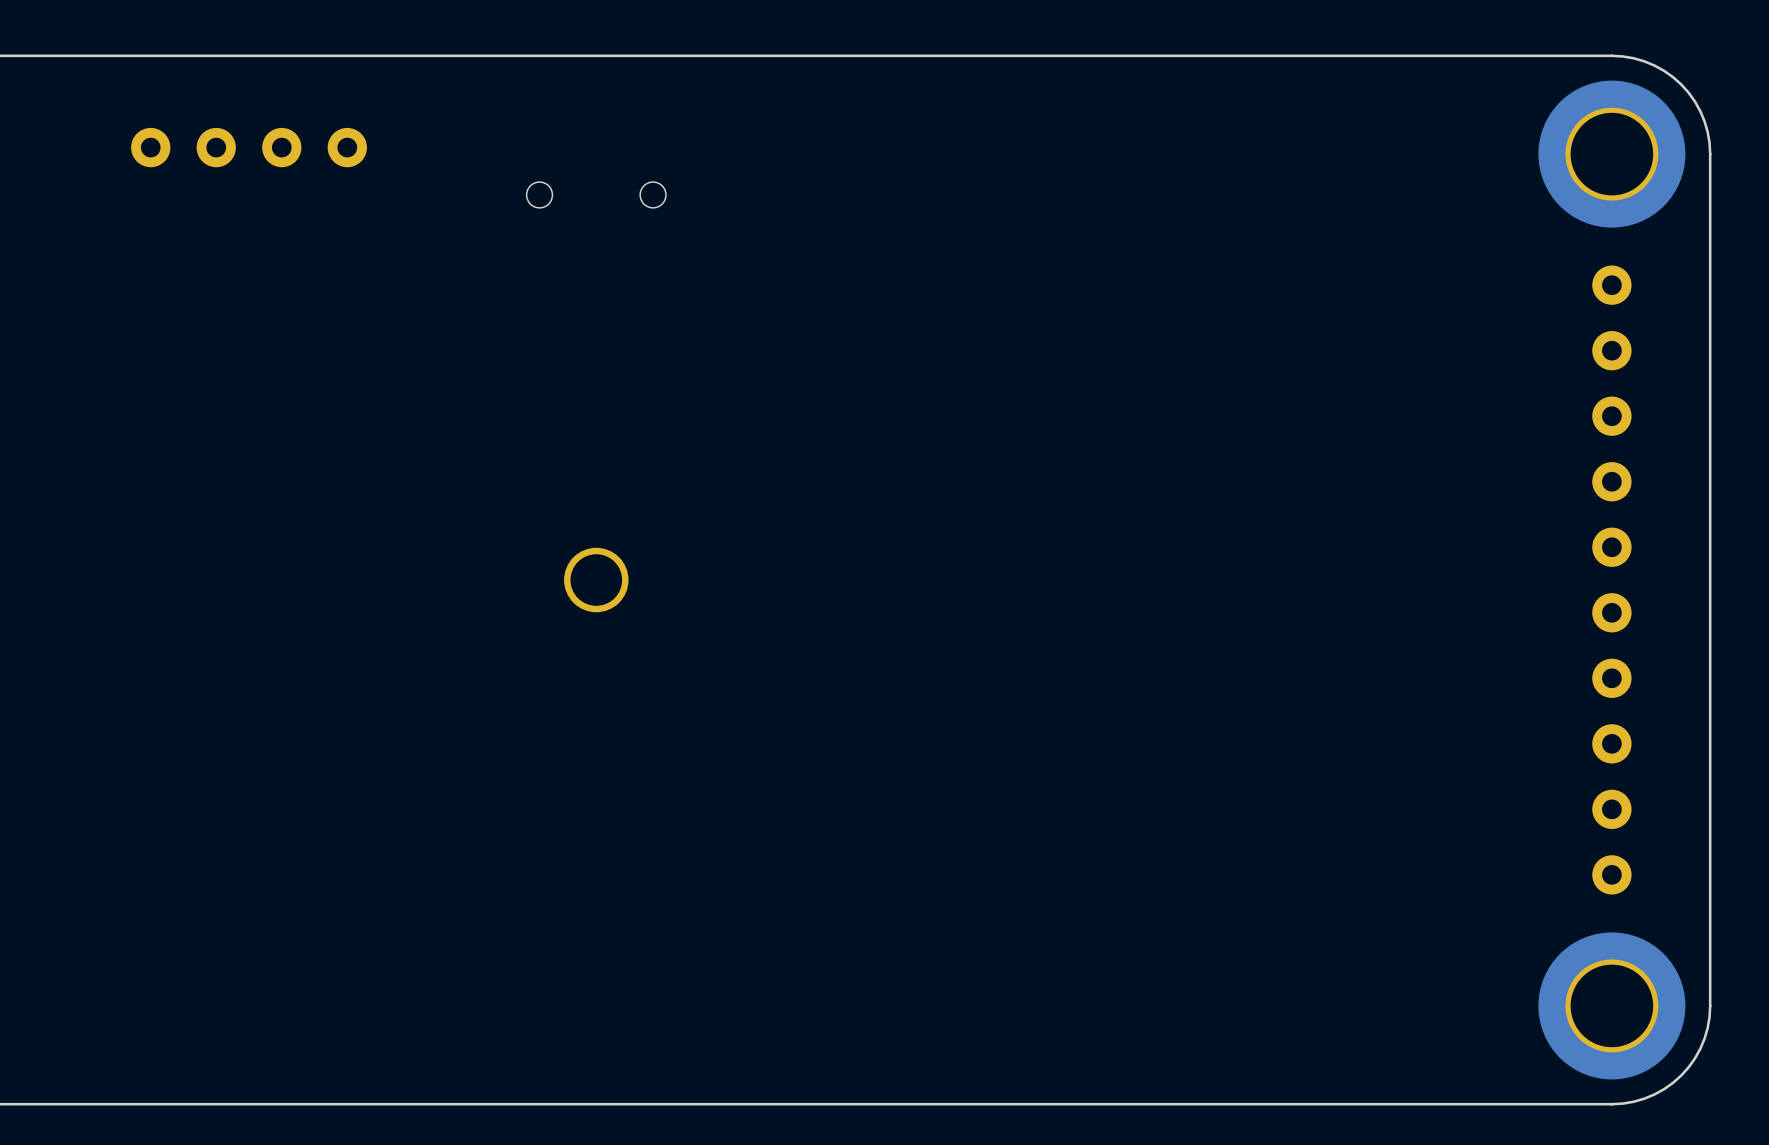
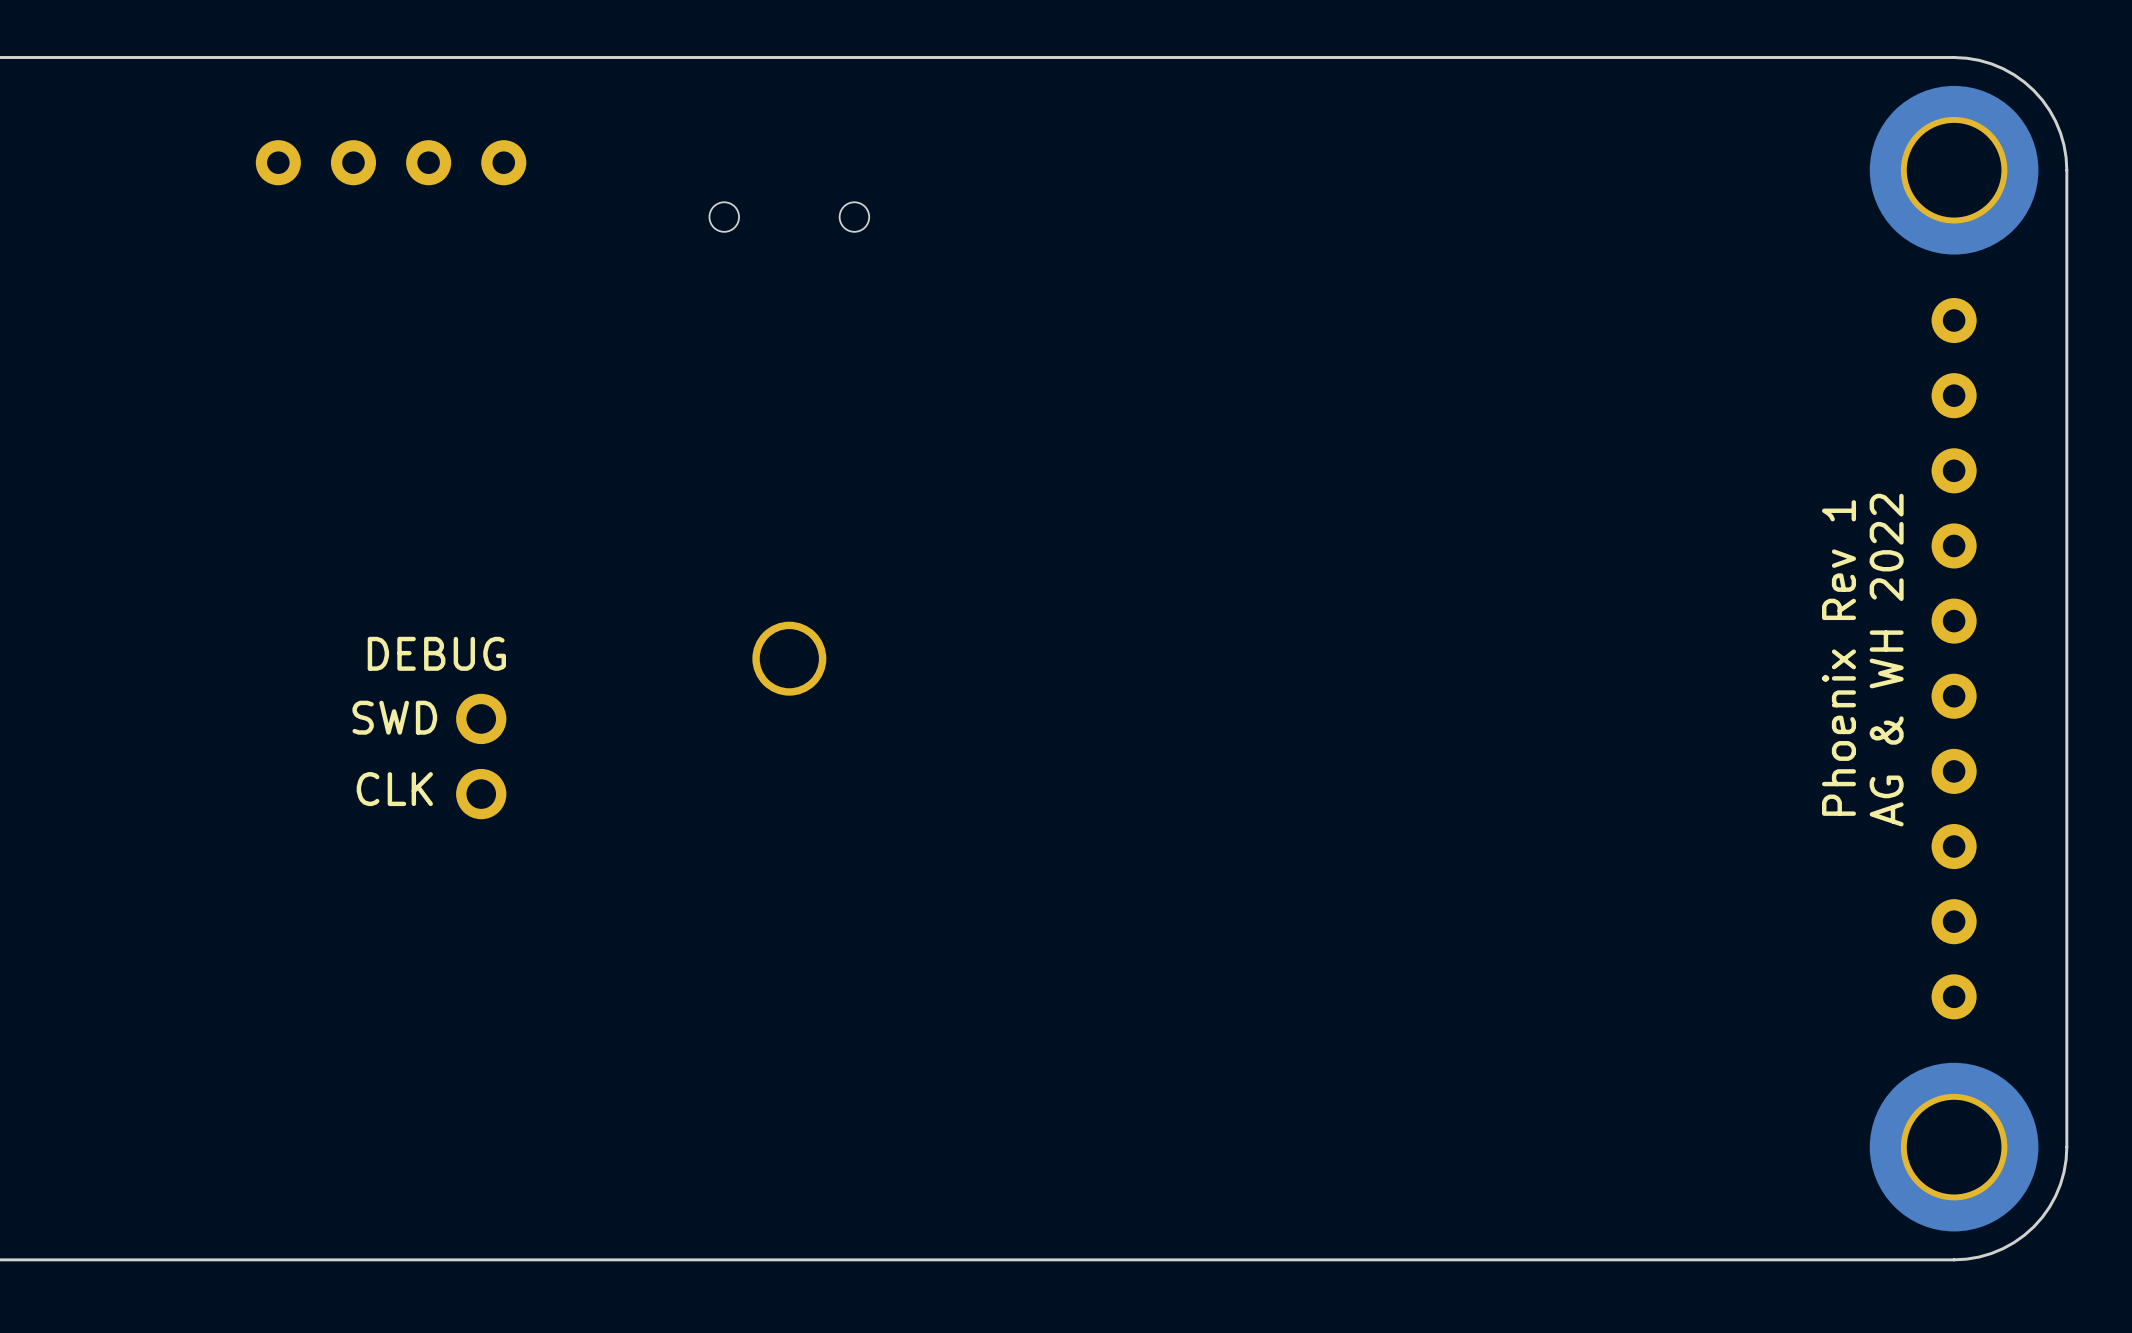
text: none -> DEBUG (436, 653)
text: none -> Phoenix Rev 1 (1839, 657)
text: none -> AG & WH 2022 (1886, 660)
text: none -> SWD (394, 717)
part: none -> (481, 756)
text: none -> CLK (394, 789)

